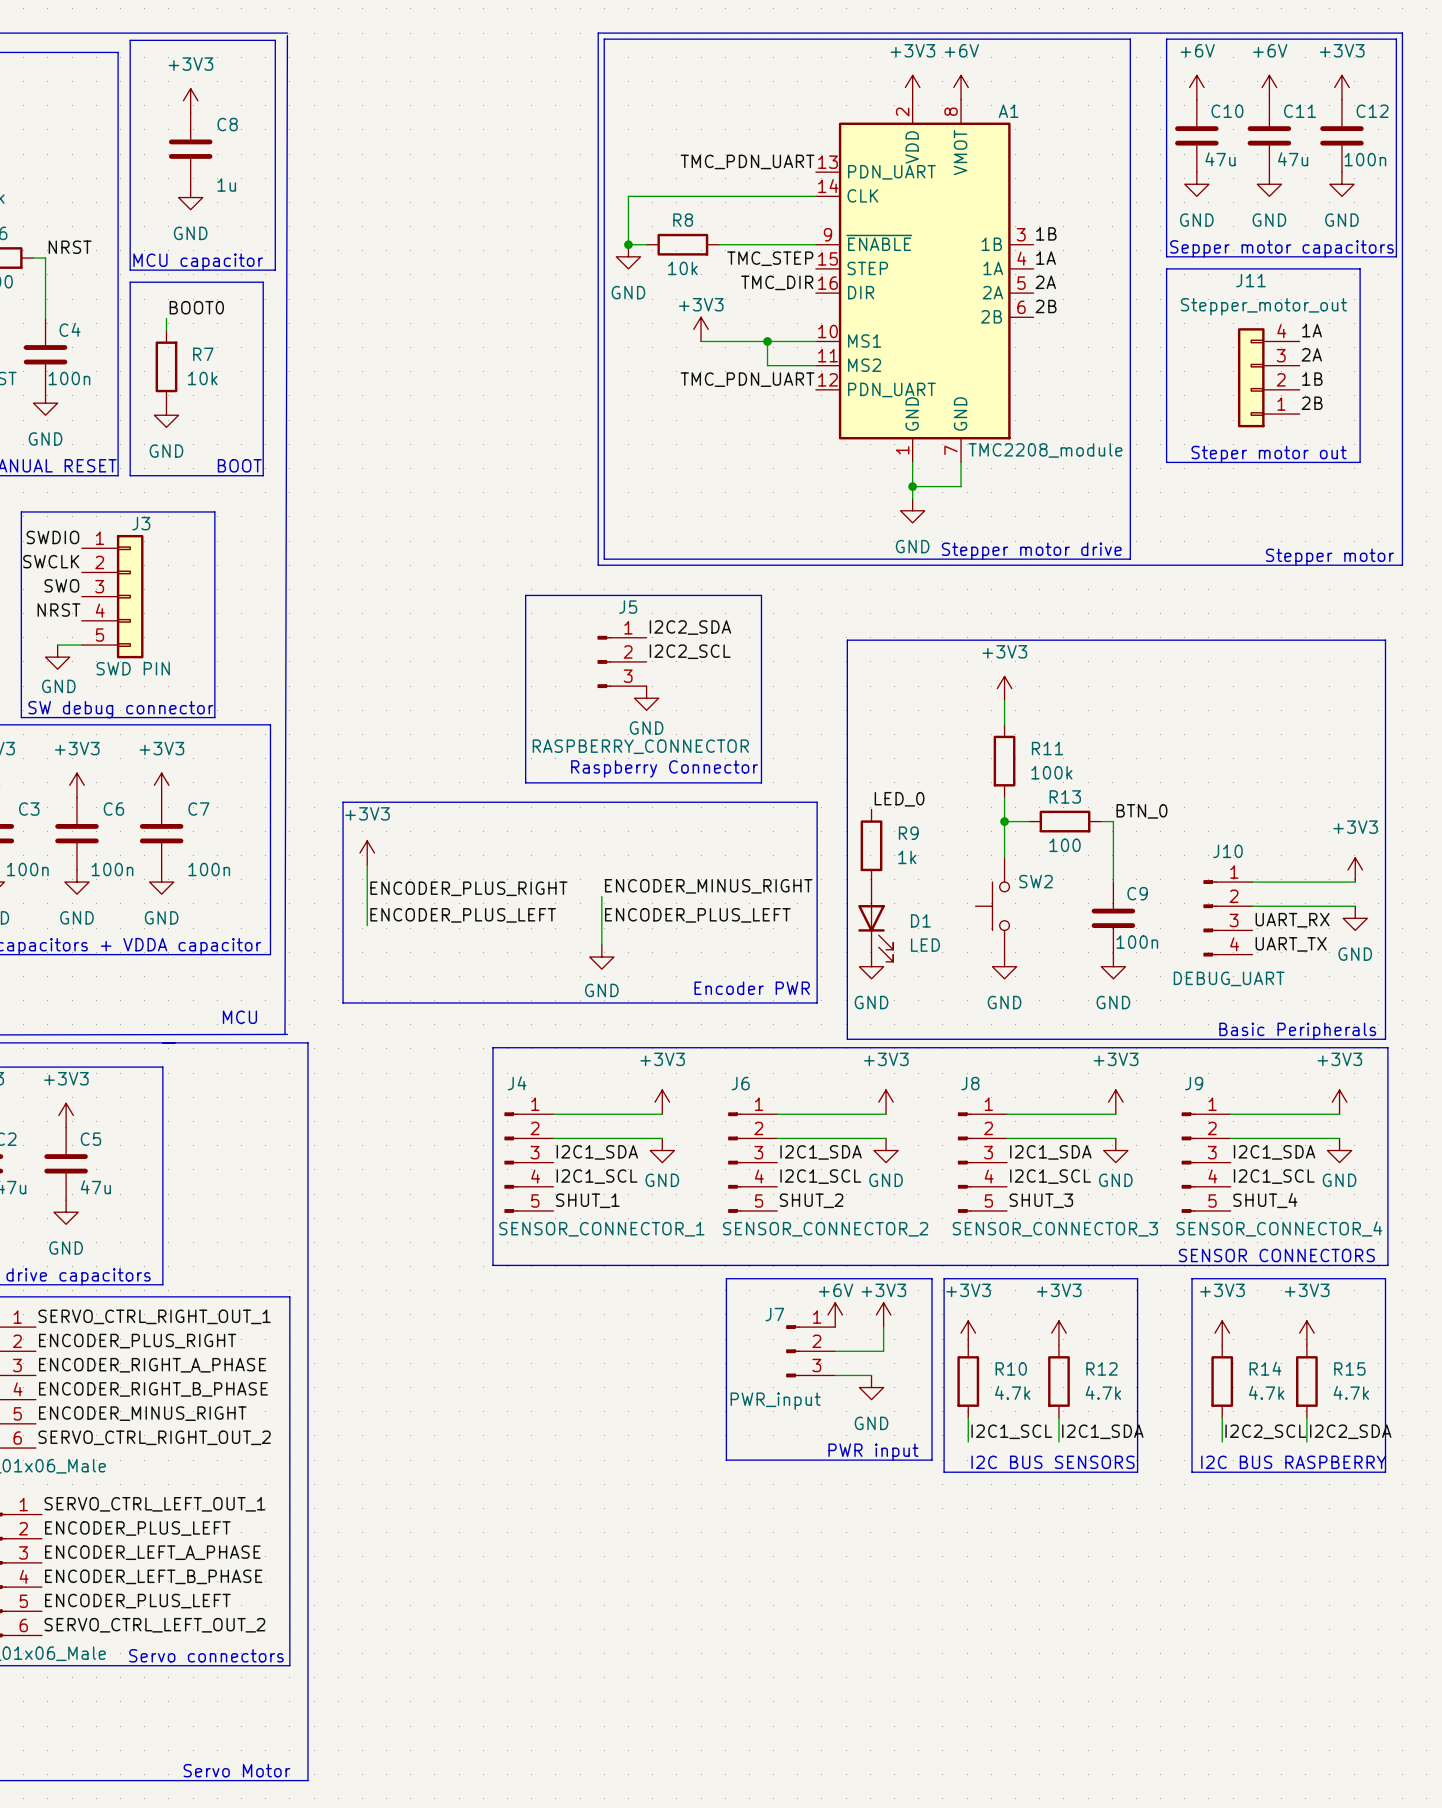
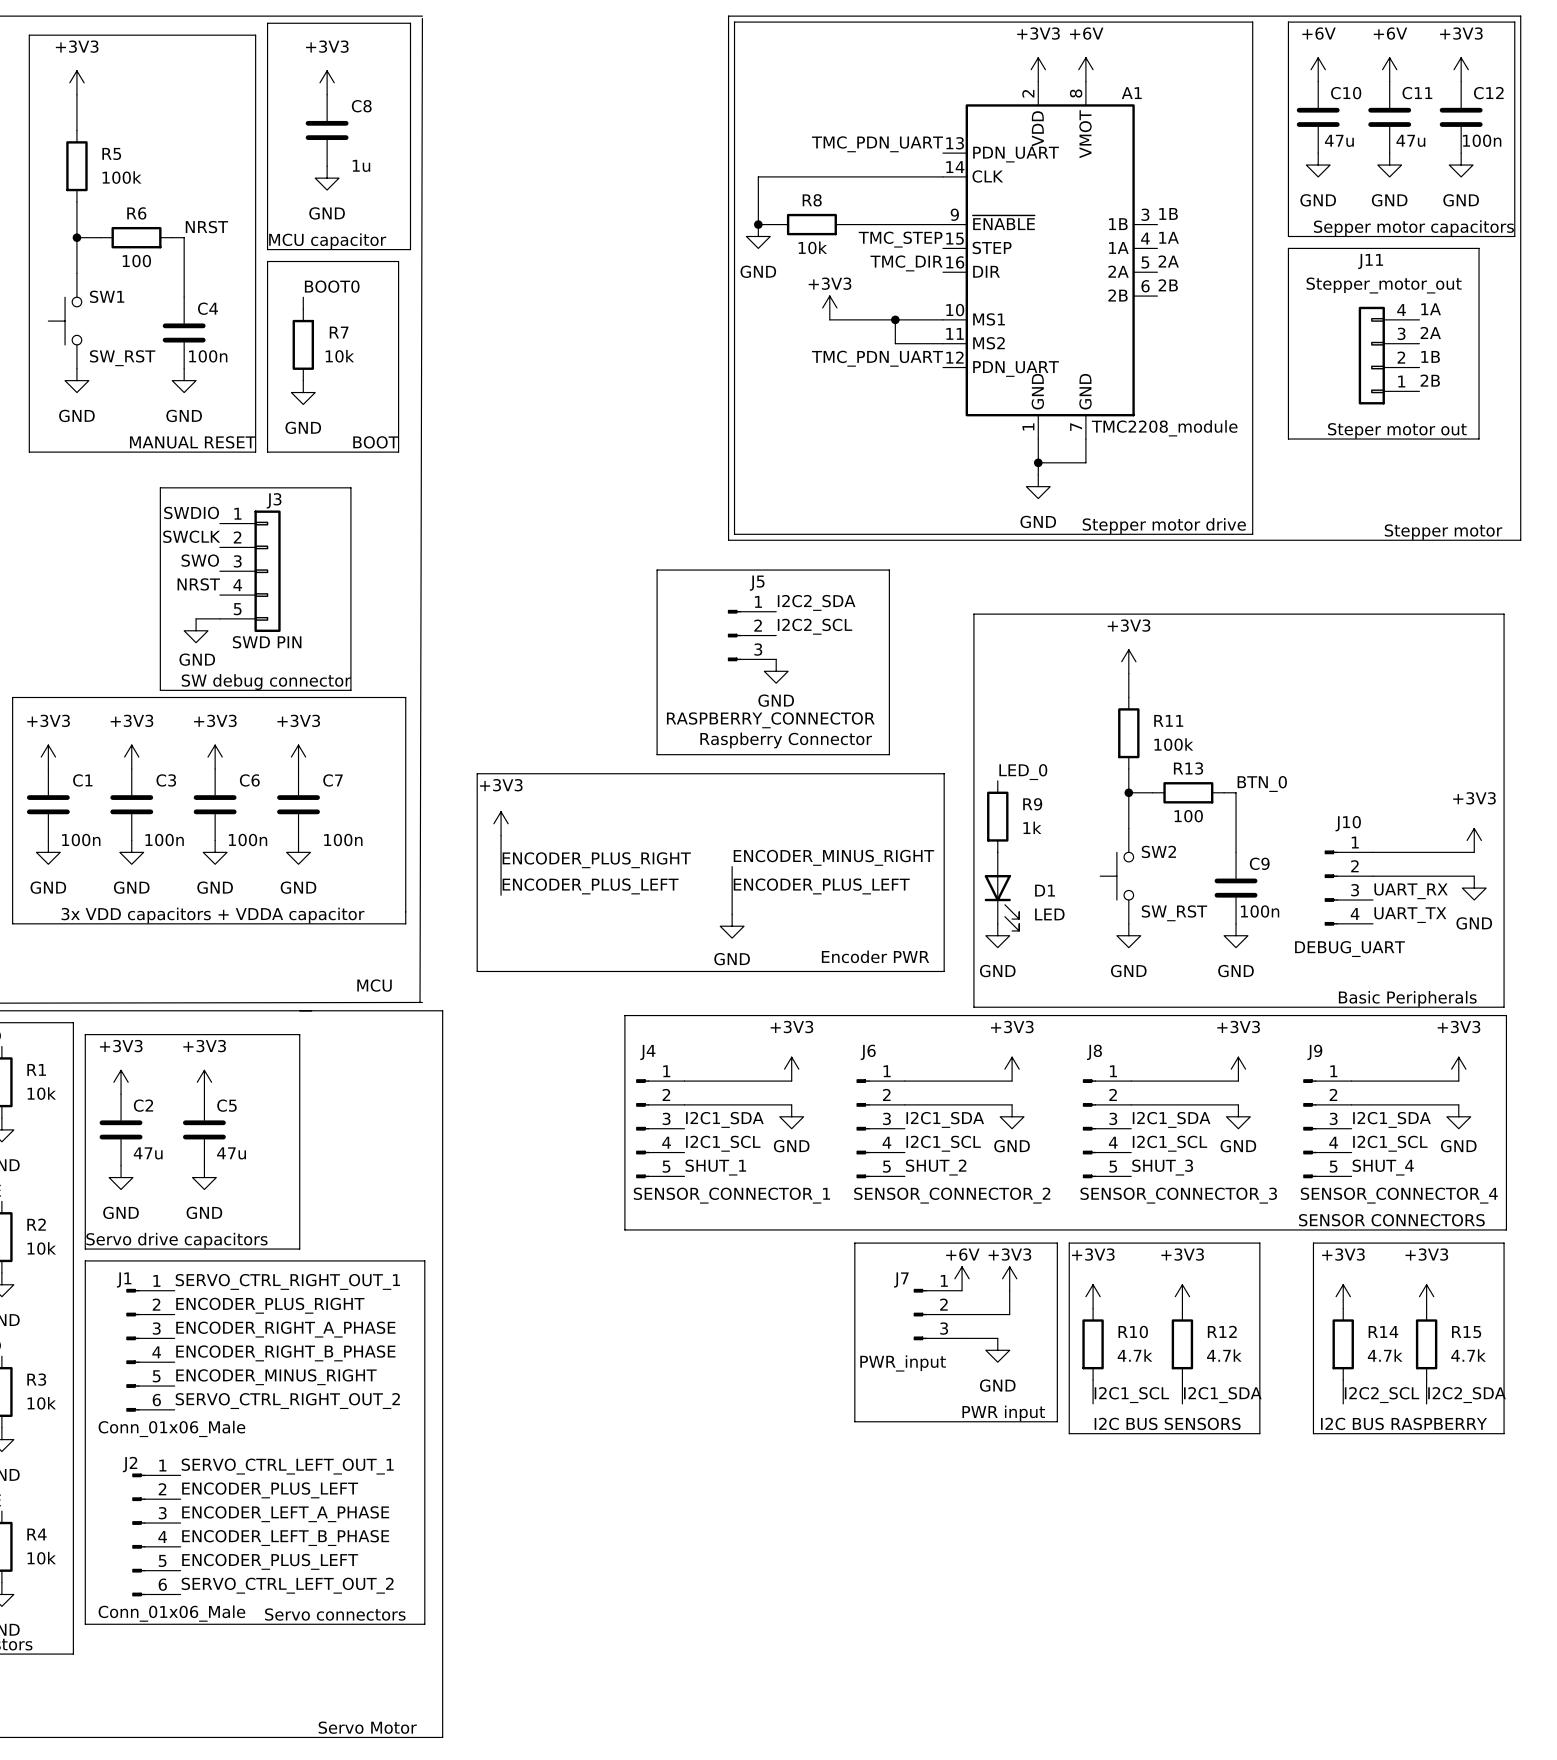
SW2 value: none -> SW_RST (1174, 913)

